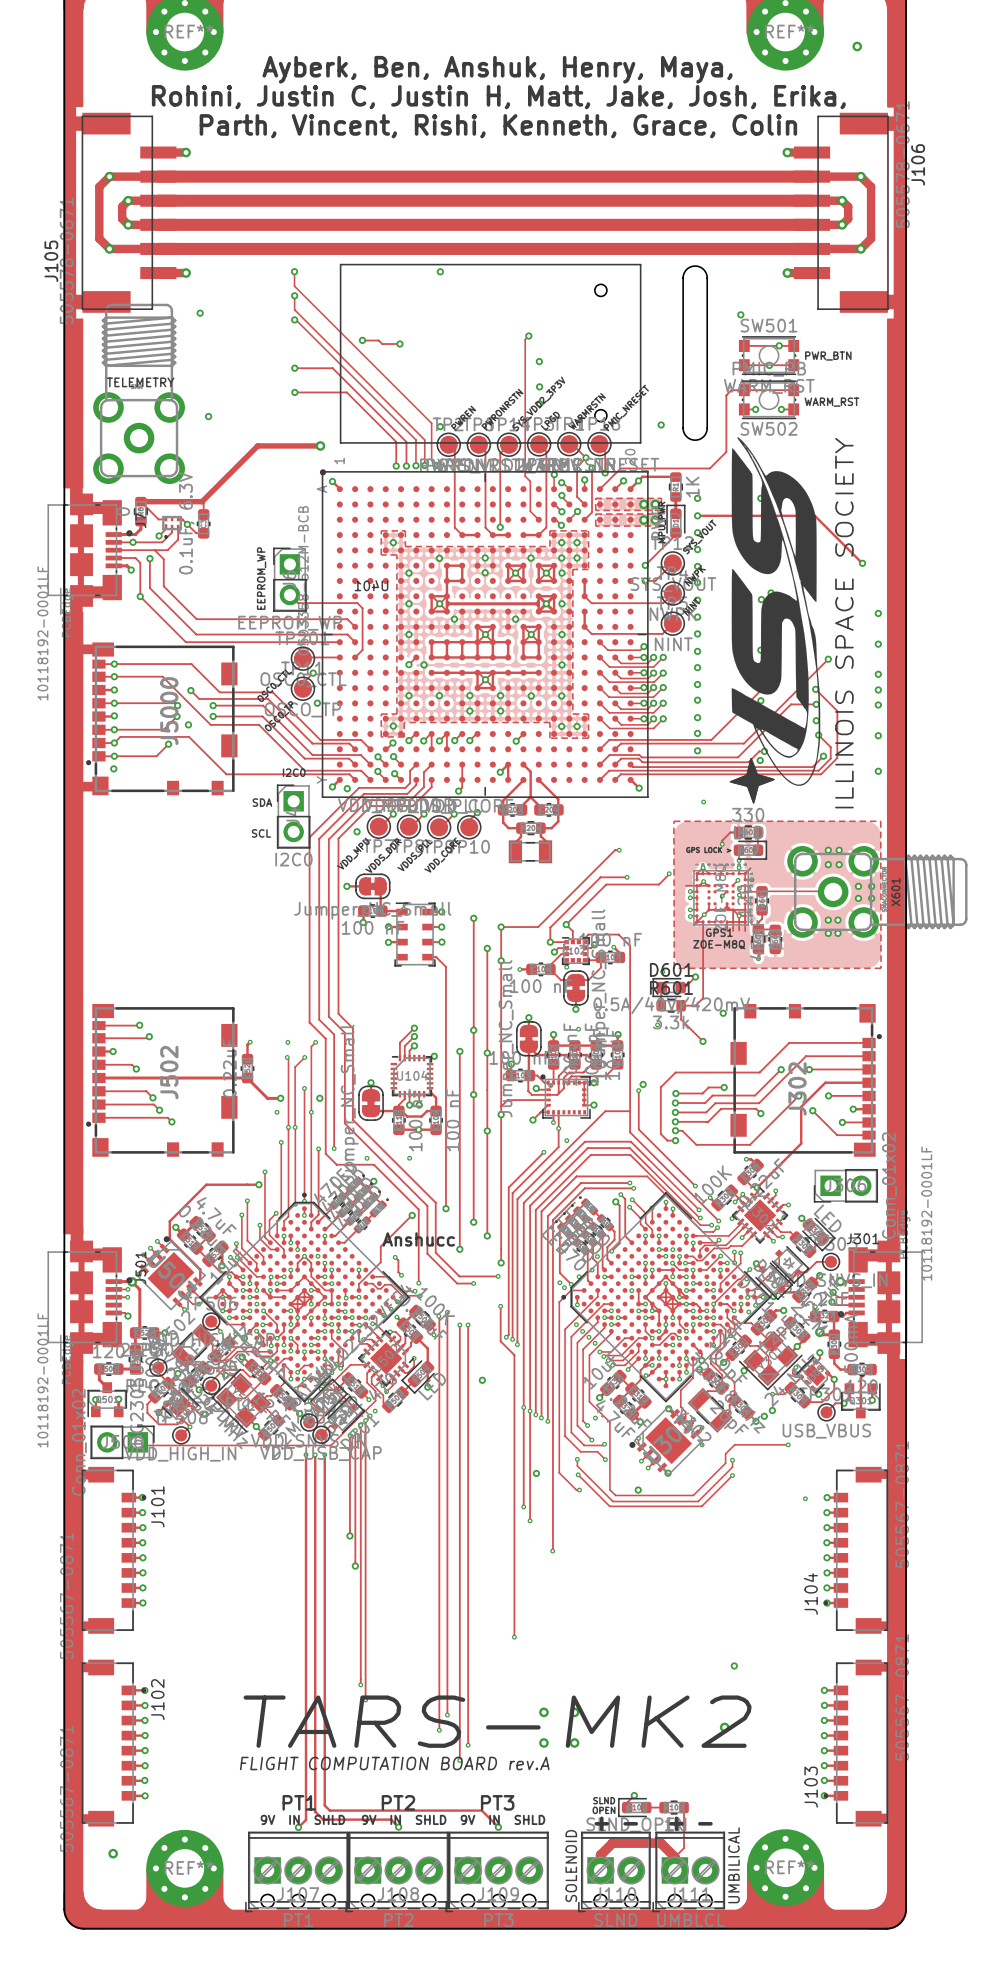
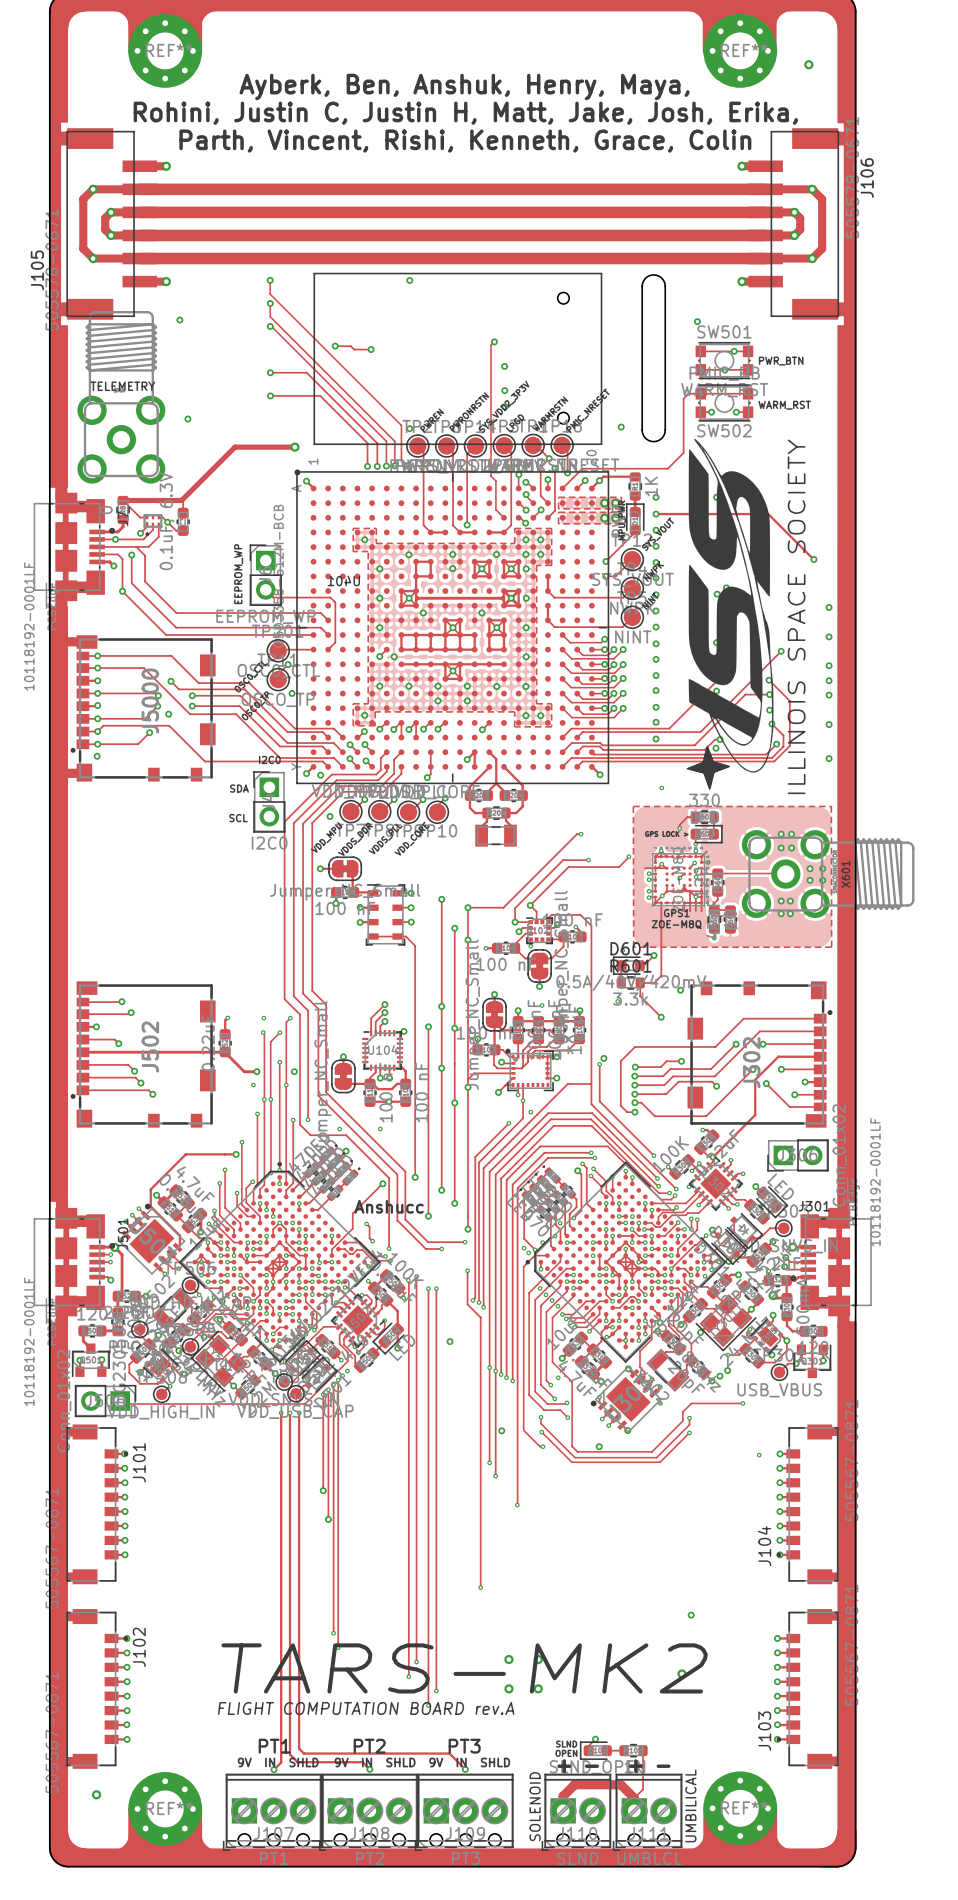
track: none -> (373, 936) (397, 936)

